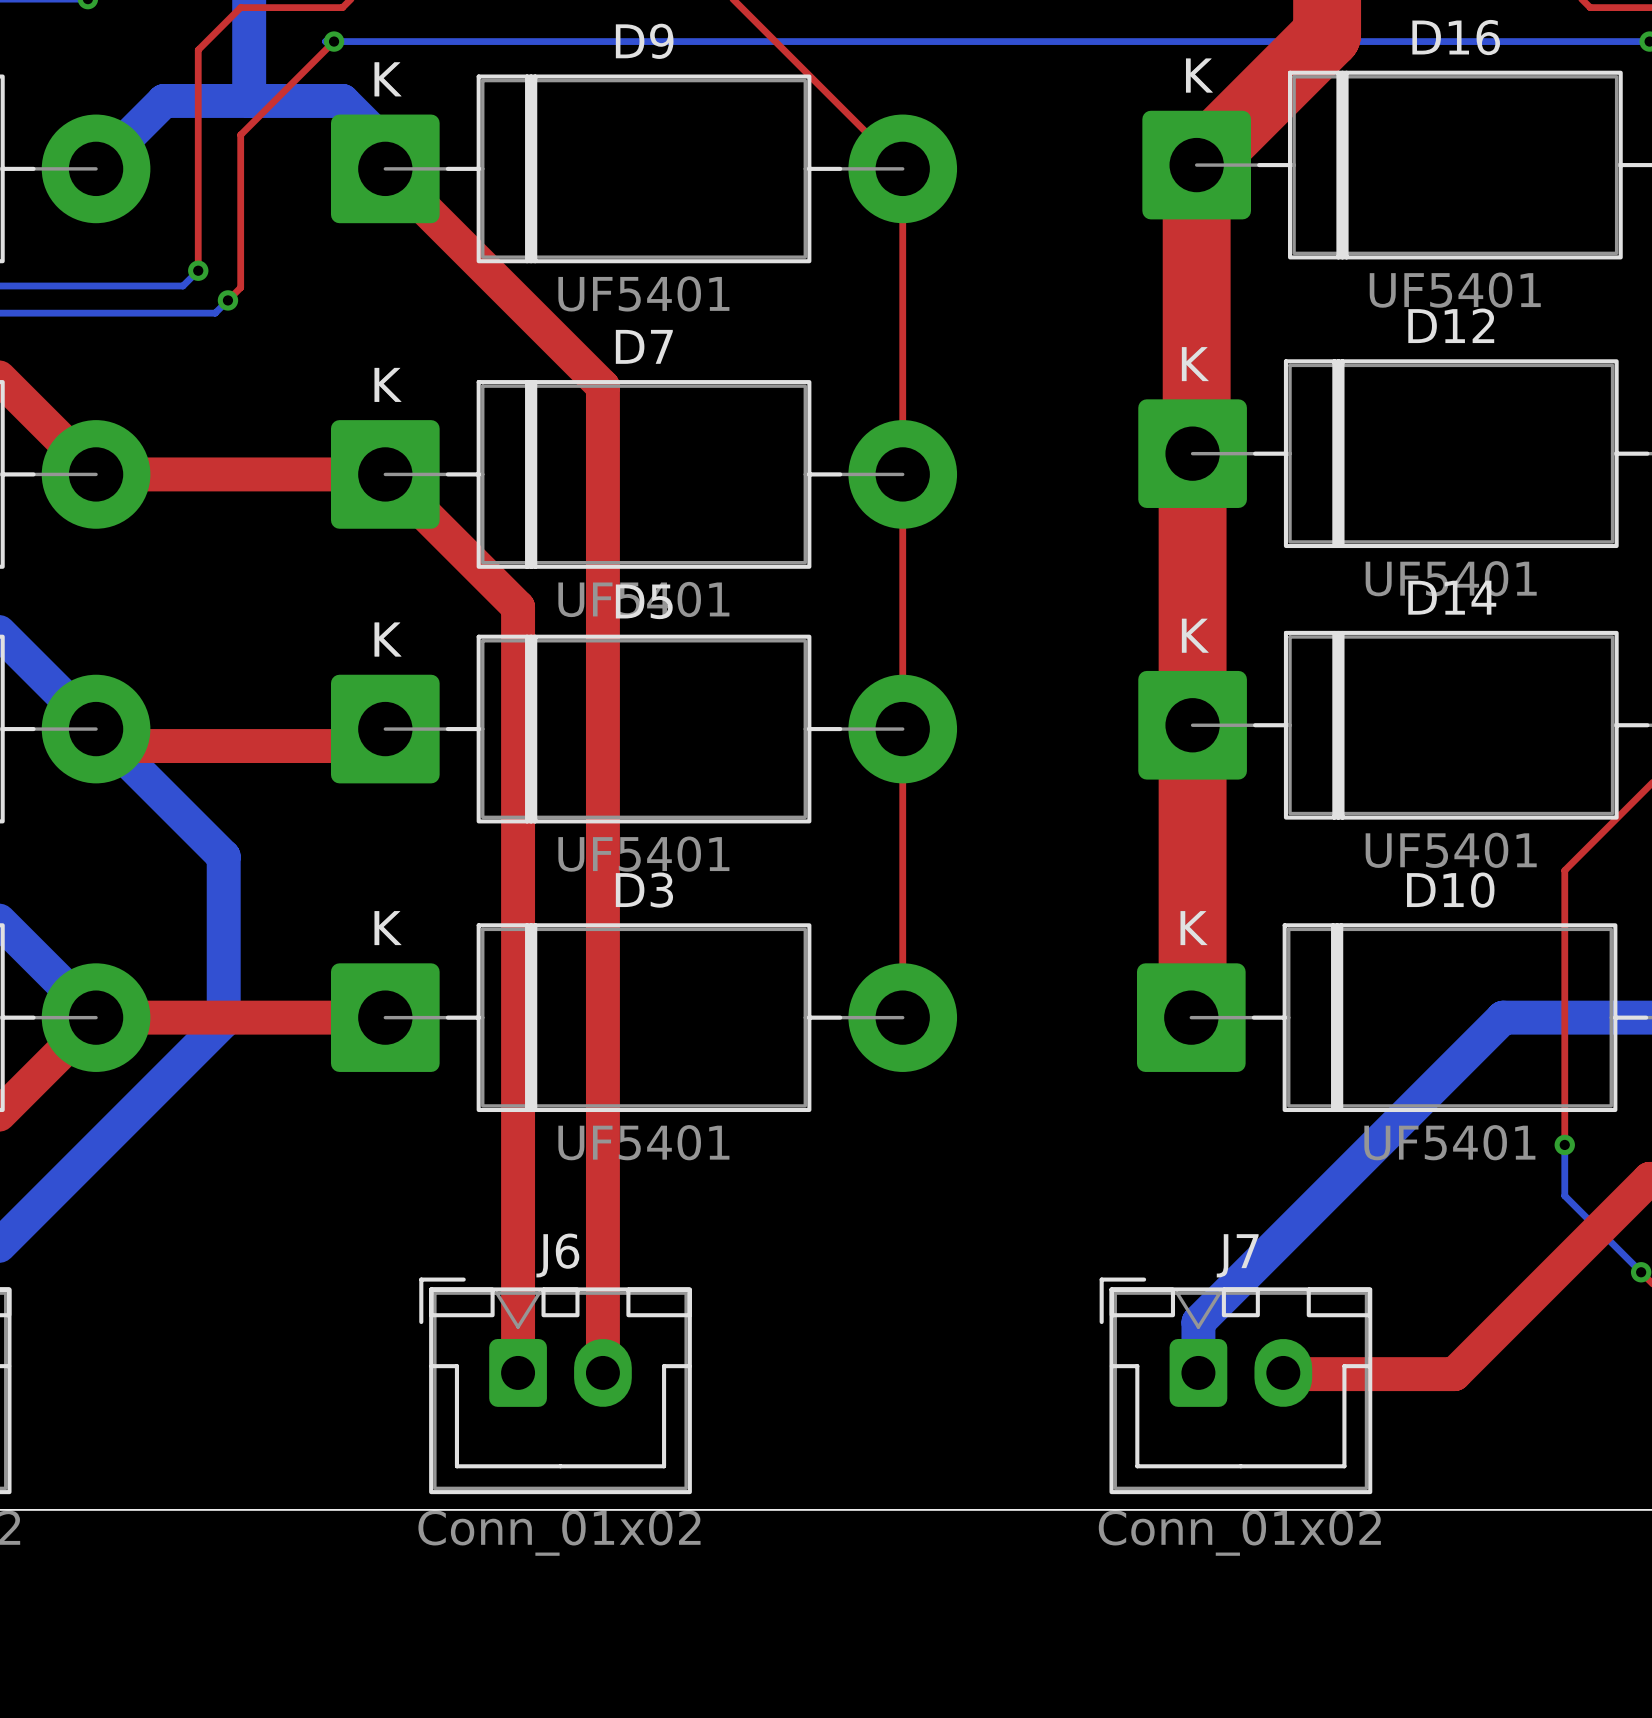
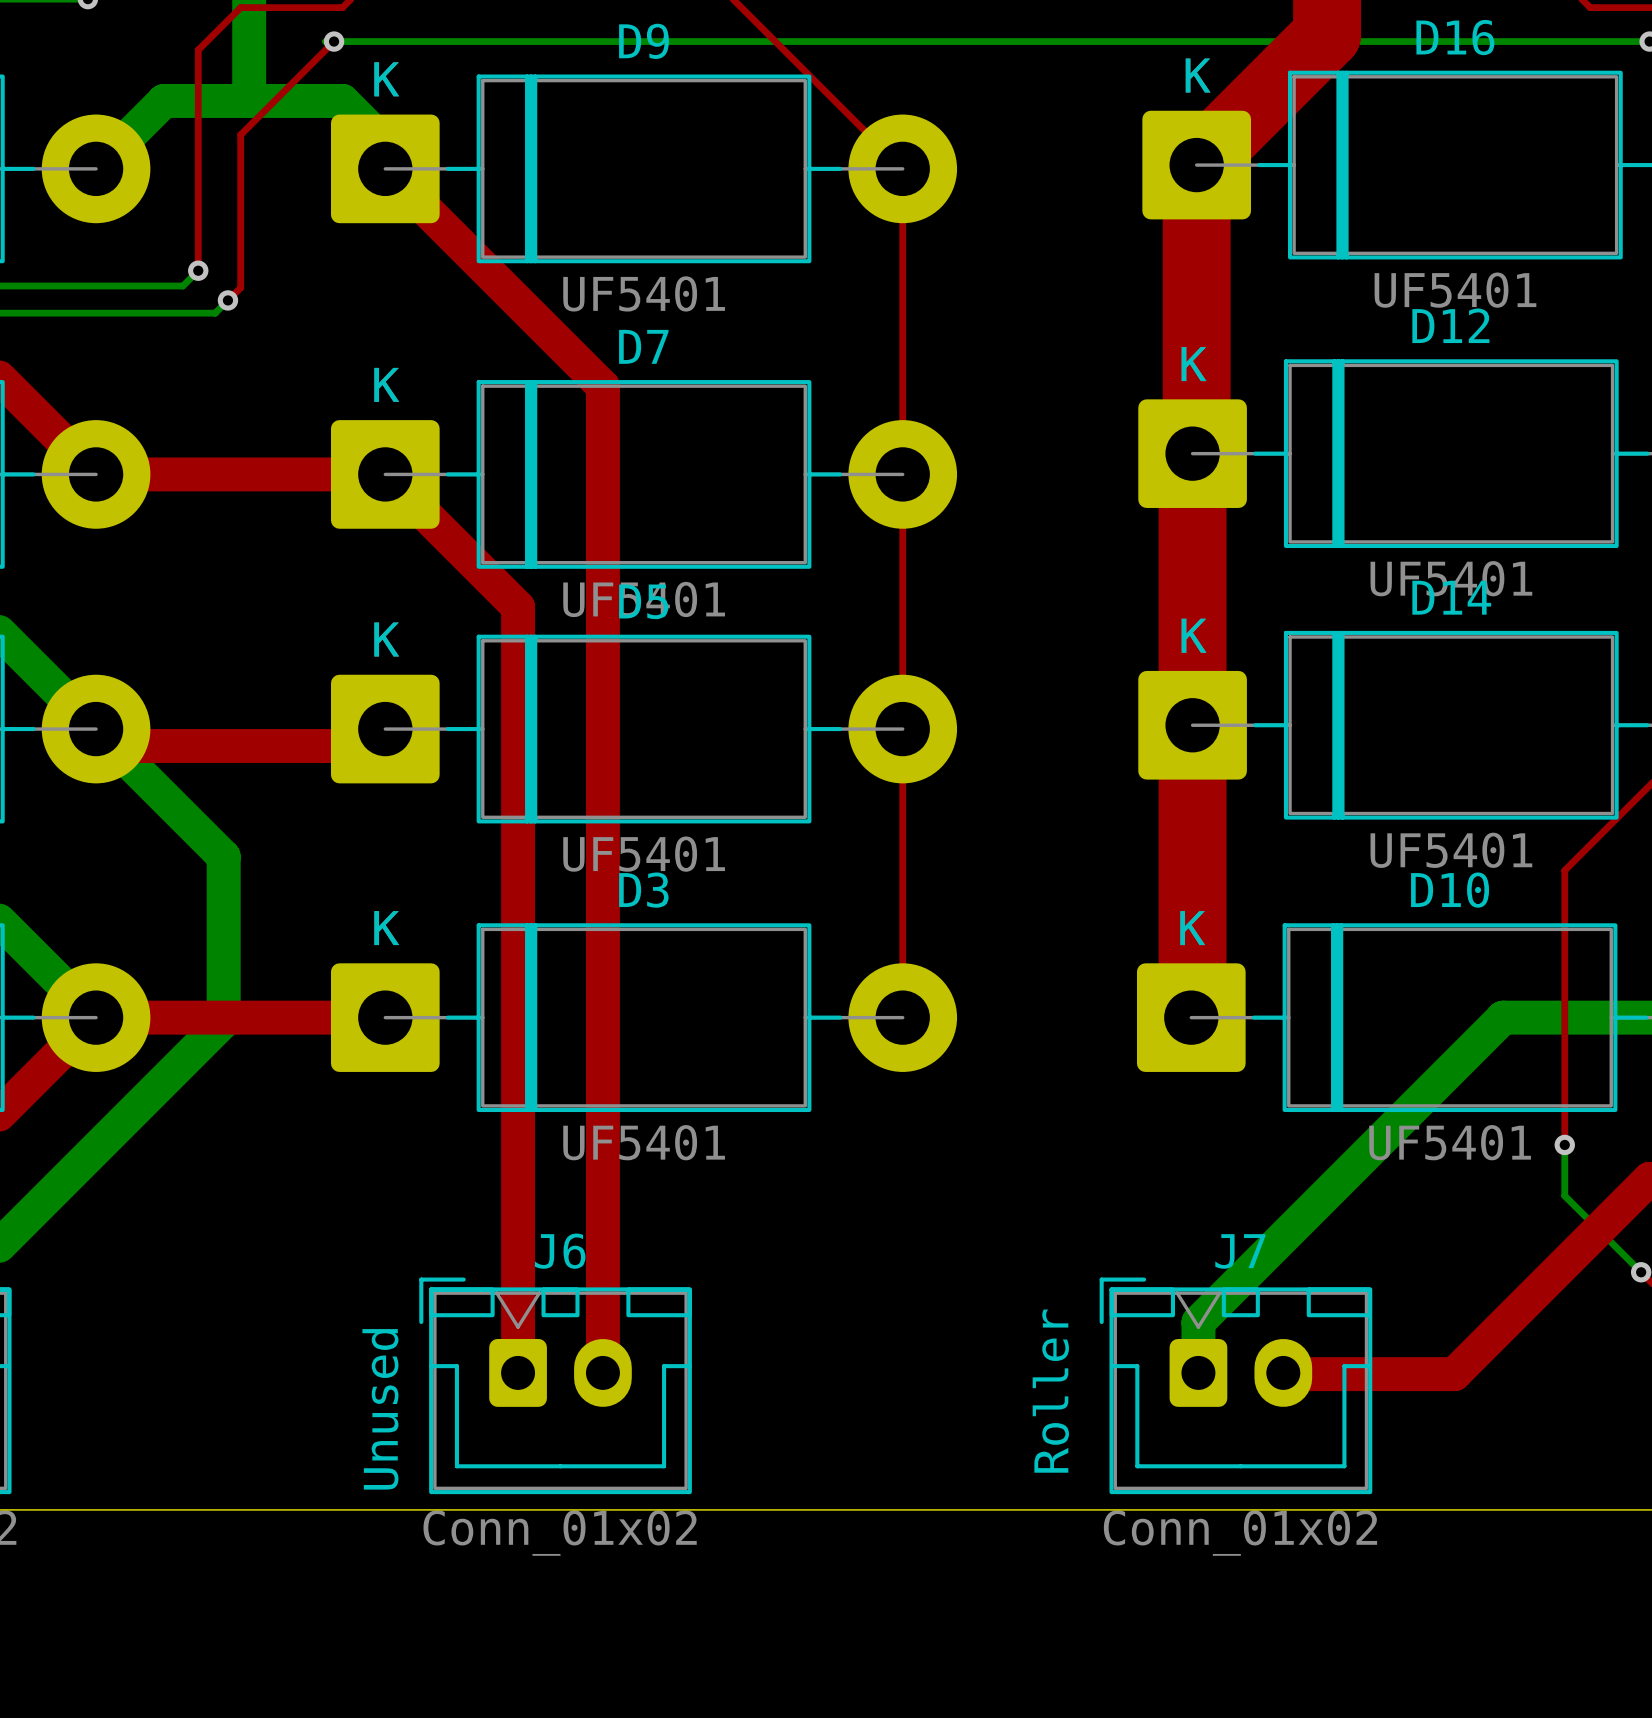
text: none -> Unused (380, 1409)
text: none -> Roller (1050, 1391)

